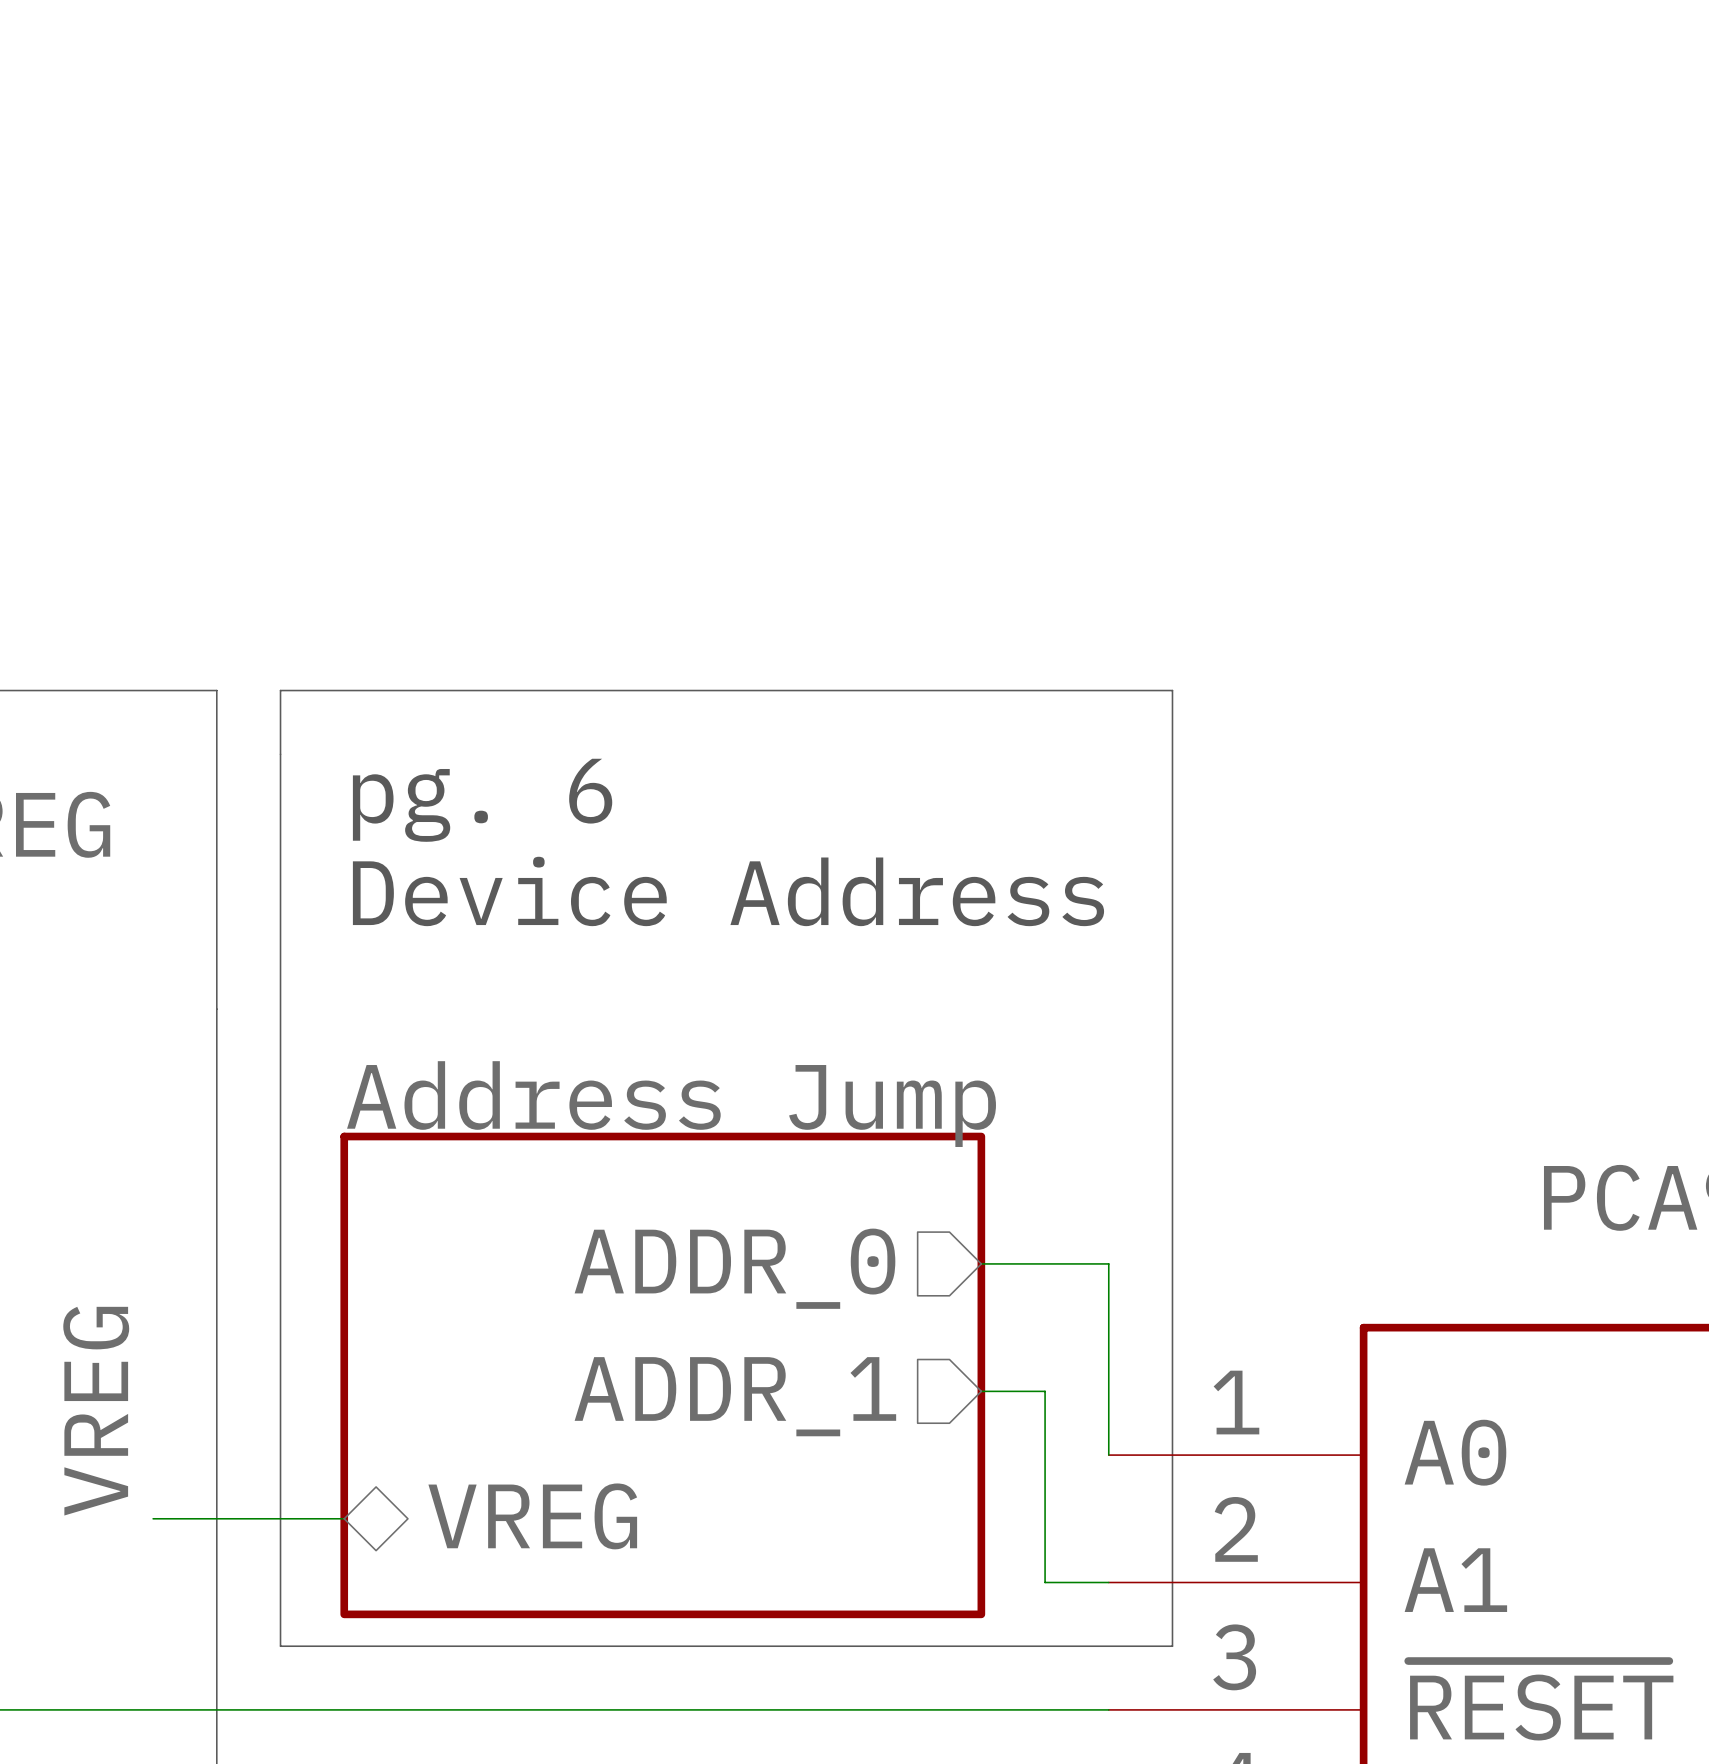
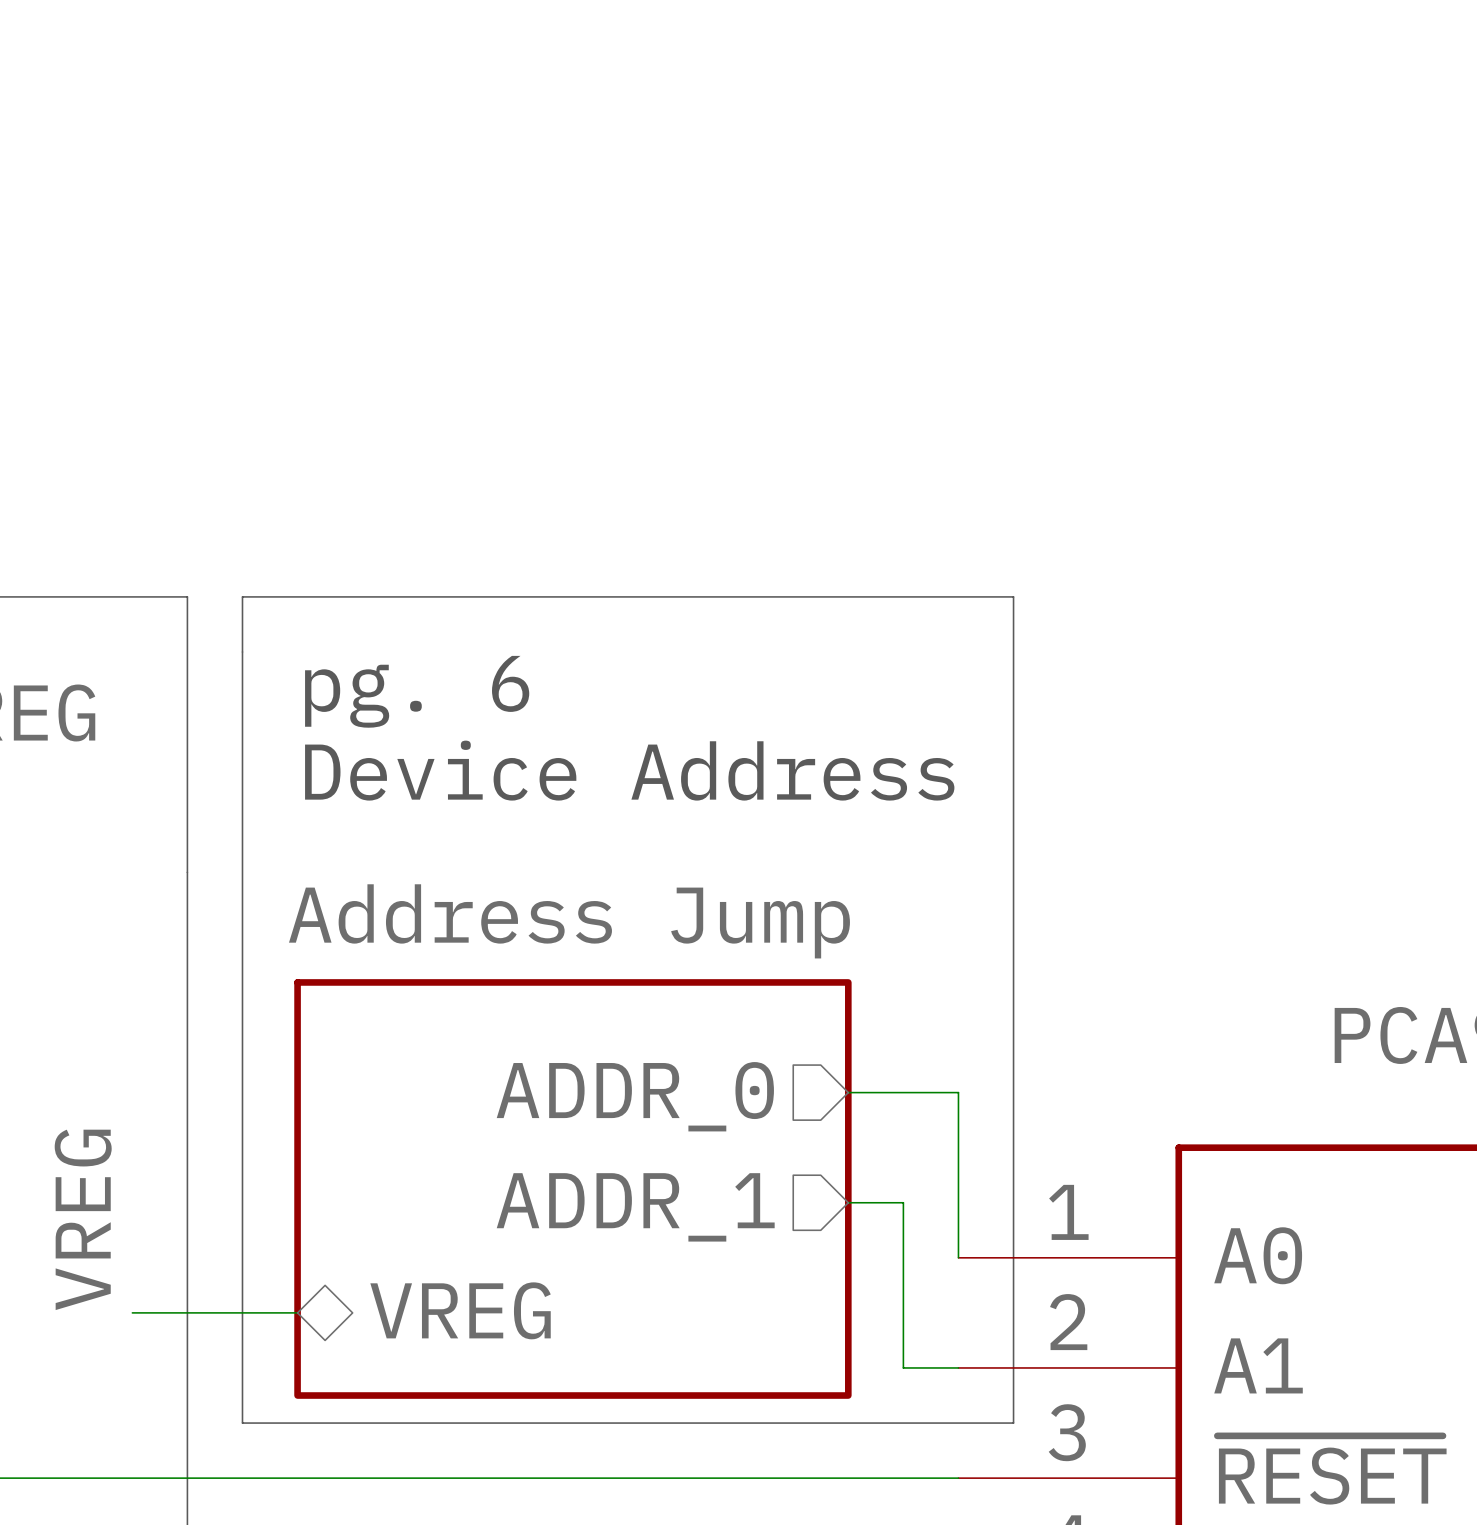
sheet Address Jump name position: Address Jump (671, 1104) -> Address Jump (569, 921)

